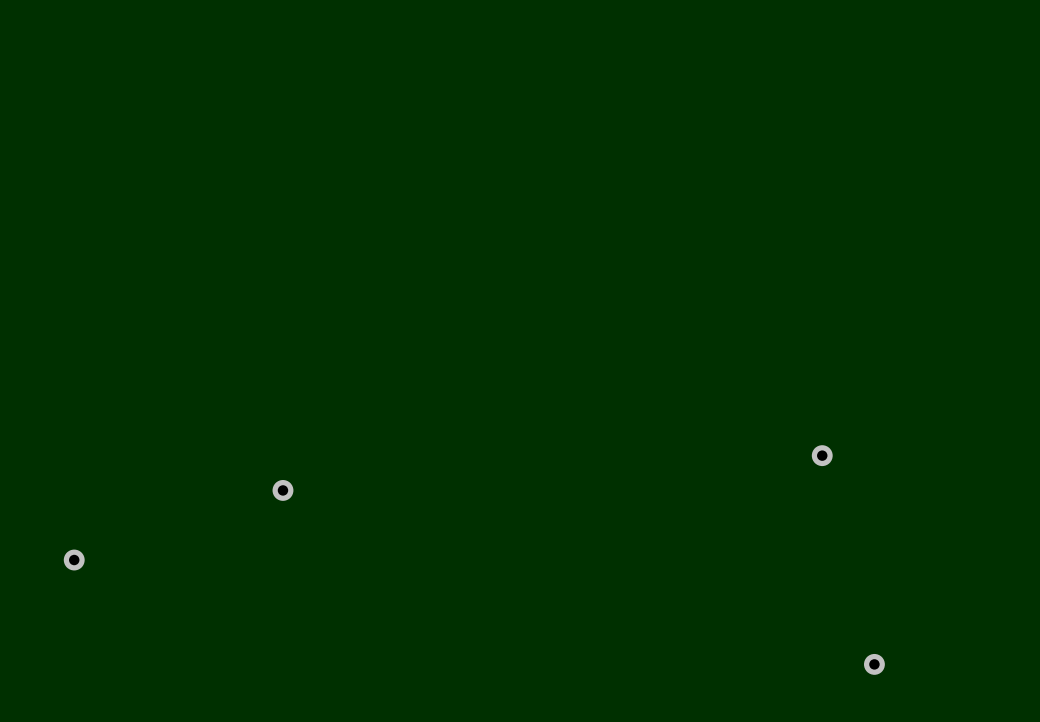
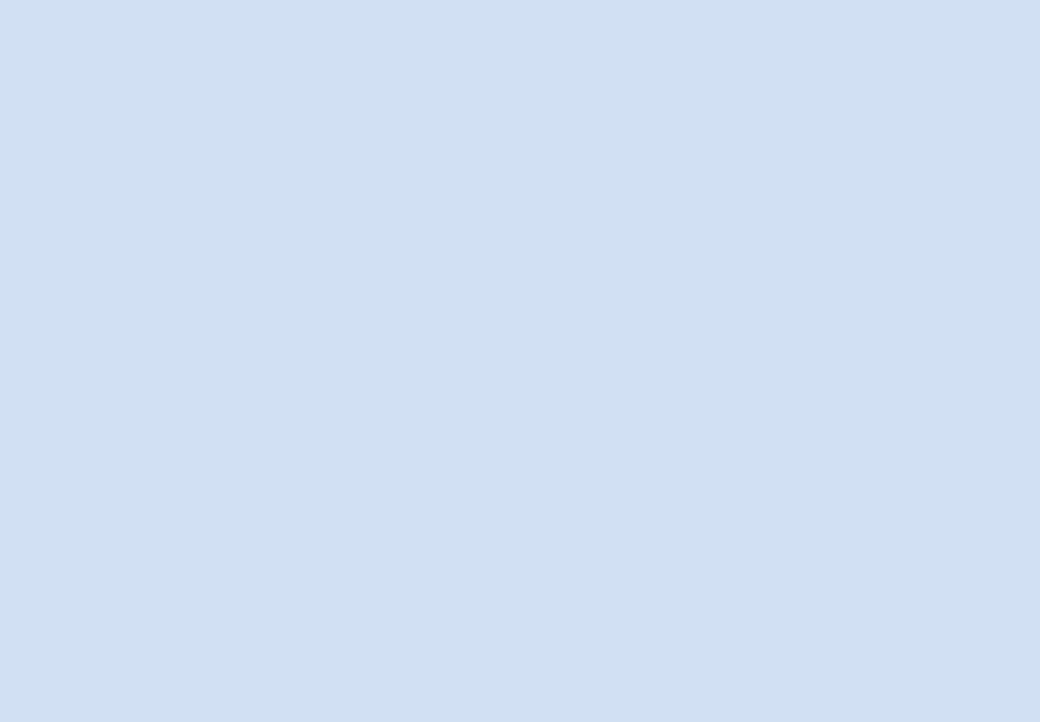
via: (822, 455) -> none
via: (282, 490) -> none
via: (74, 560) -> none
via: (874, 664) -> none

